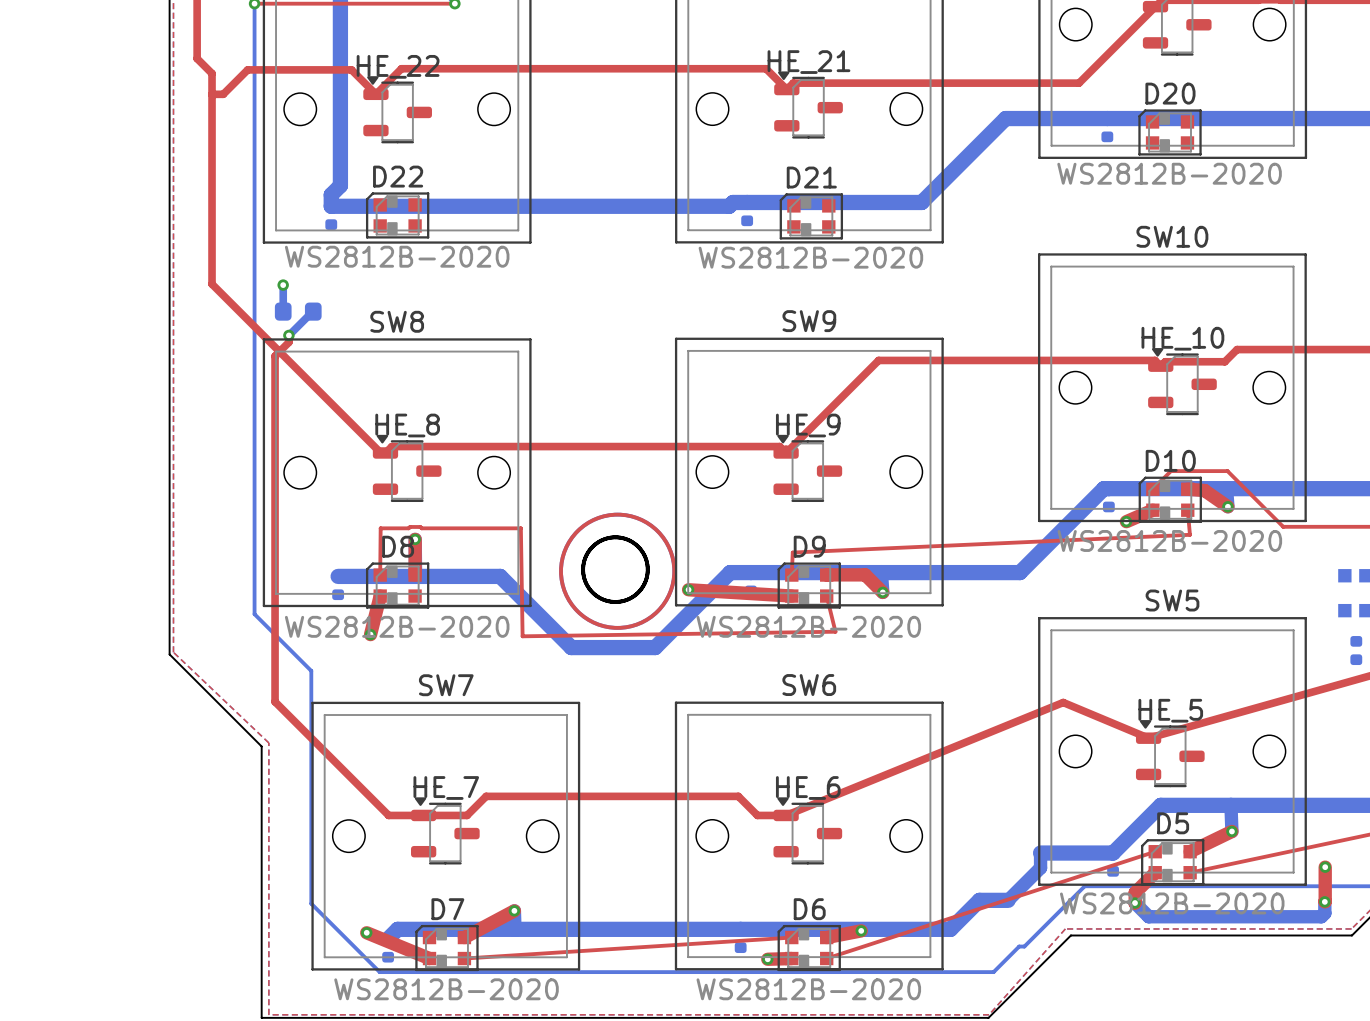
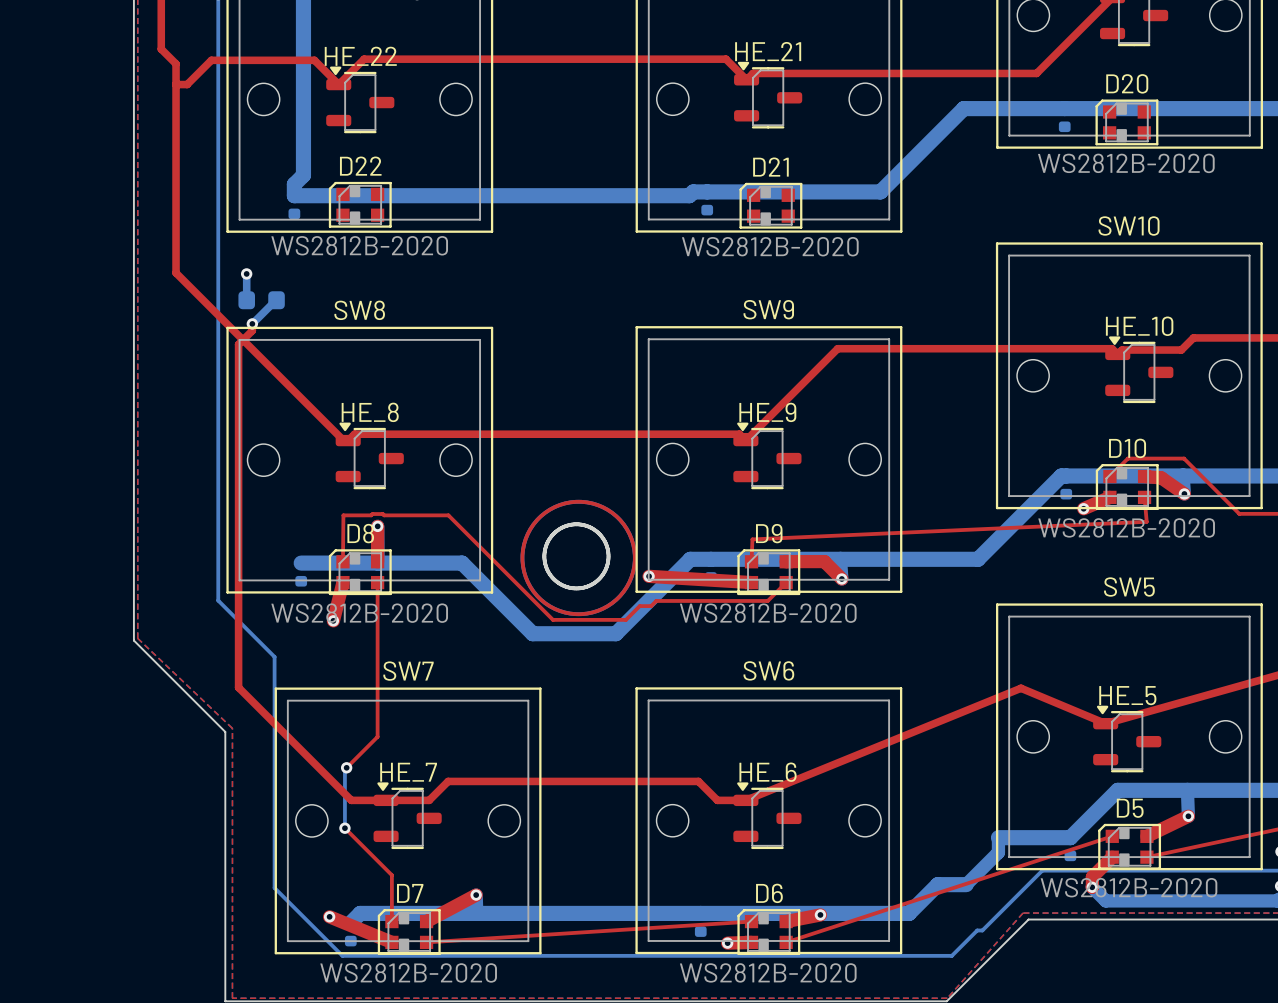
top track: (486, 528) (520, 528) (522, 636) (835, 631) (826, 596) -> (448, 515) (553, 619) (625, 619) (639, 606) (651, 606) (656, 600) (767, 600) (786, 582)
top track: none -> (377, 582) (377, 736) (346, 767)
bottom track: none -> (346, 767) (344, 769) (344, 828)
via: none -> (346, 767)
top track: none -> (344, 828) (391, 875) (391, 921)
via: none -> (344, 828)

